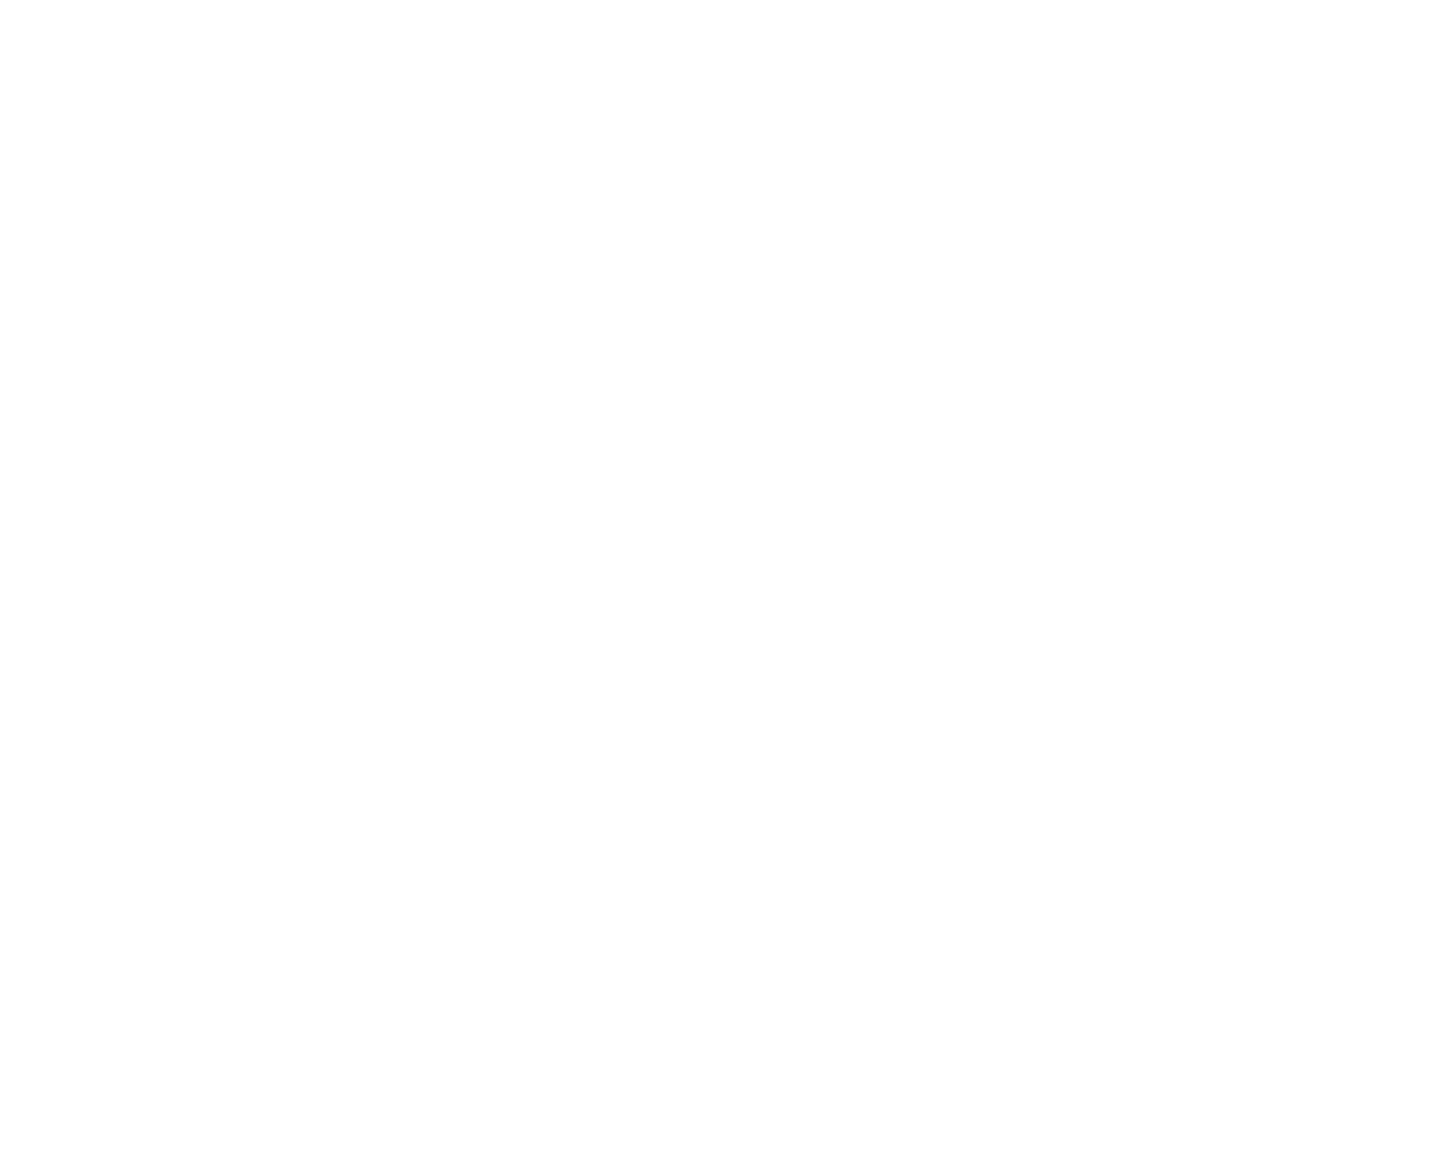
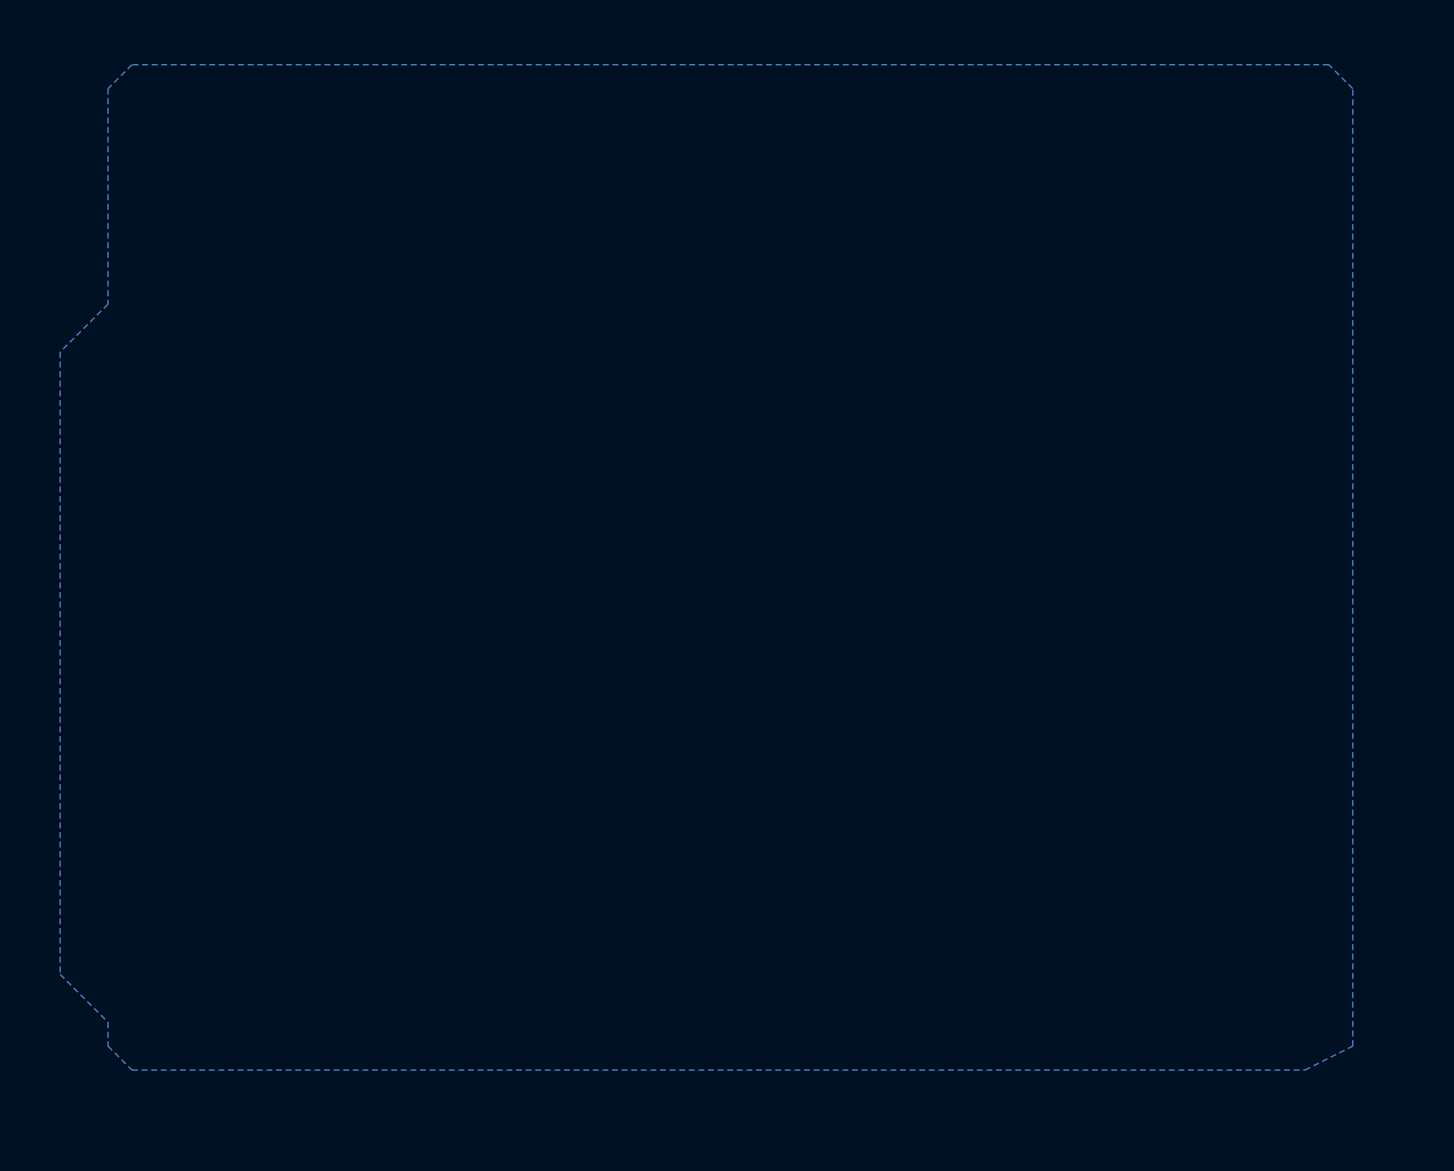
zone outline: none -> (1328, 64) (1352, 88) (1352, 1046) (1304, 1070) (131, 1070) (108, 1046) (108, 1022) (60, 974) (60, 351) (108, 304) (108, 88) (131, 64) (1328, 64)

